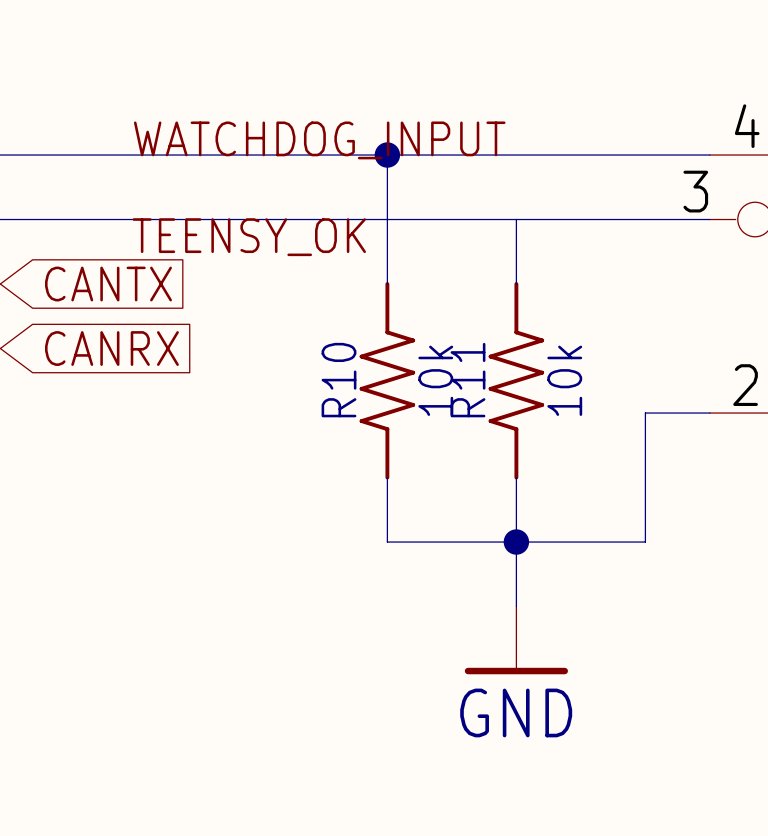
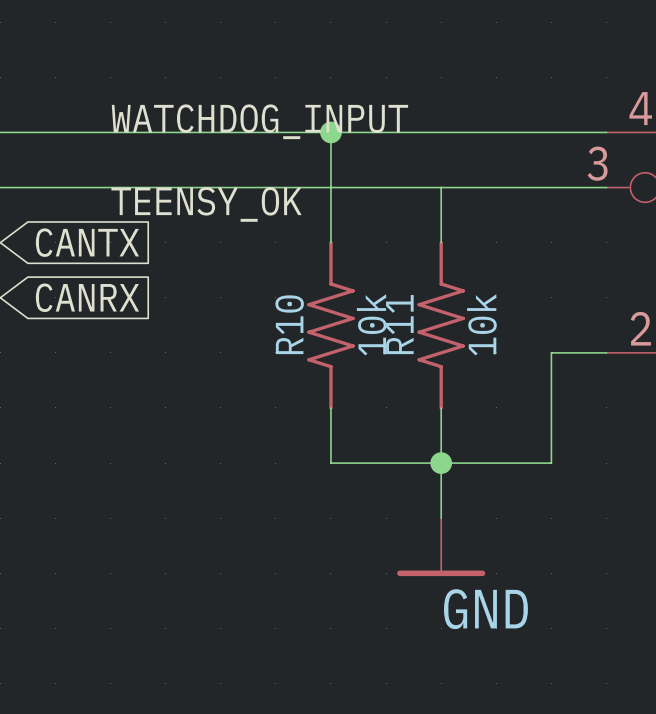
power symbol text position: GND (516, 712) -> GND (485, 609)

